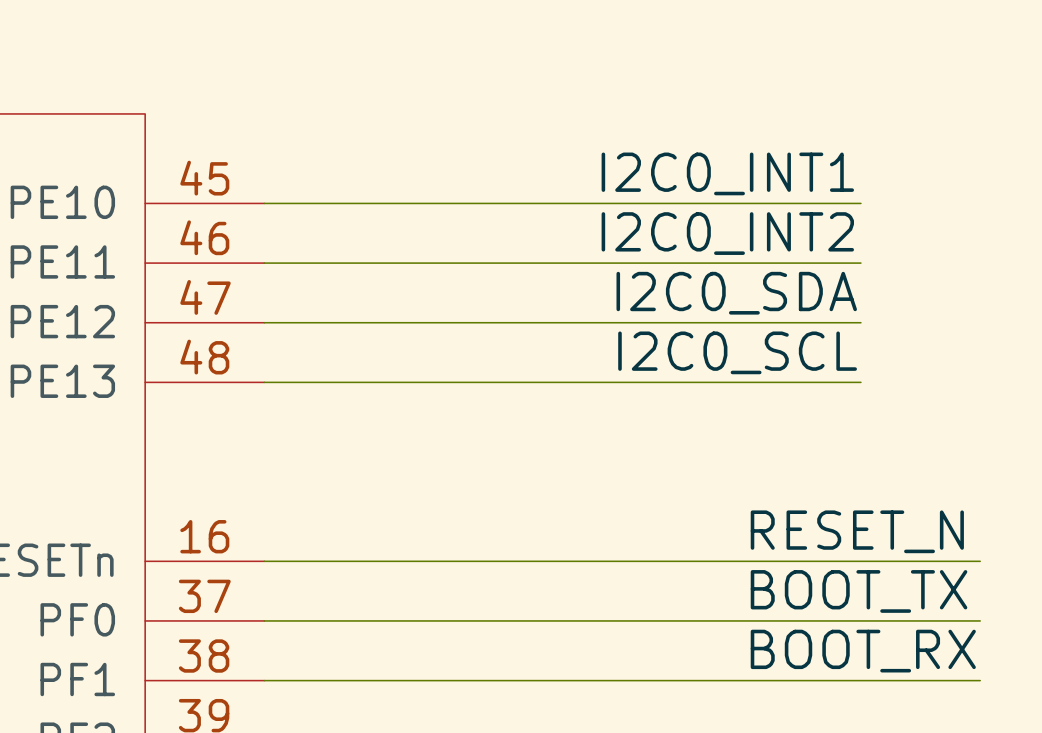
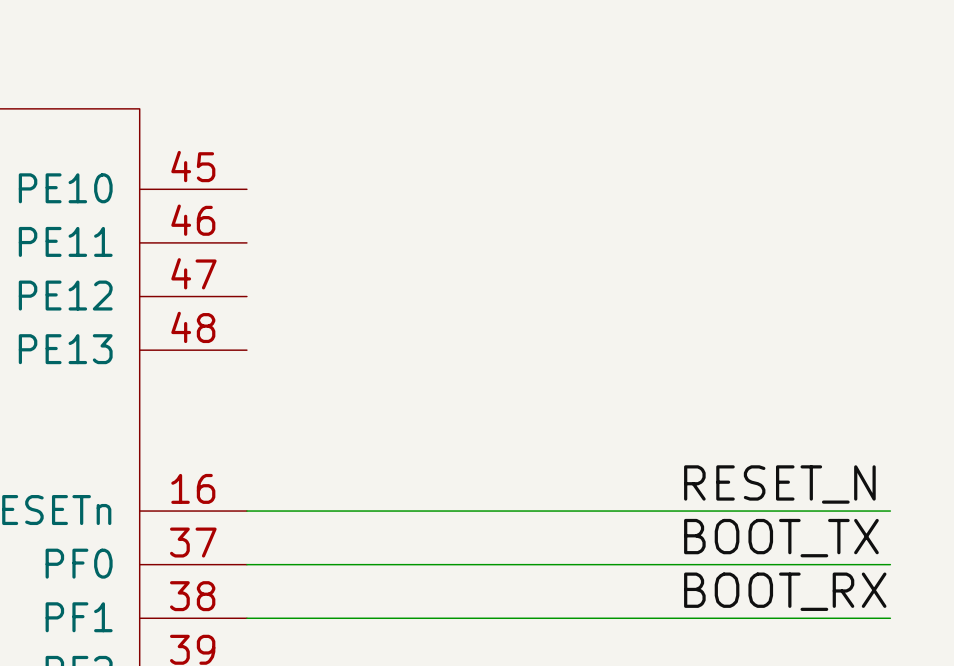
label: I2C0_INT1 (727, 173) -> none
wire: (264, 203) (860, 203) -> none
label: I2C0_INT2 (727, 233) -> none
wire: (264, 263) (860, 263) -> none
label: I2C0_SDA (736, 293) -> none
wire: (264, 322) (860, 322) -> none
label: I2C0_SCL (737, 352) -> none
wire: (264, 382) (860, 382) -> none

